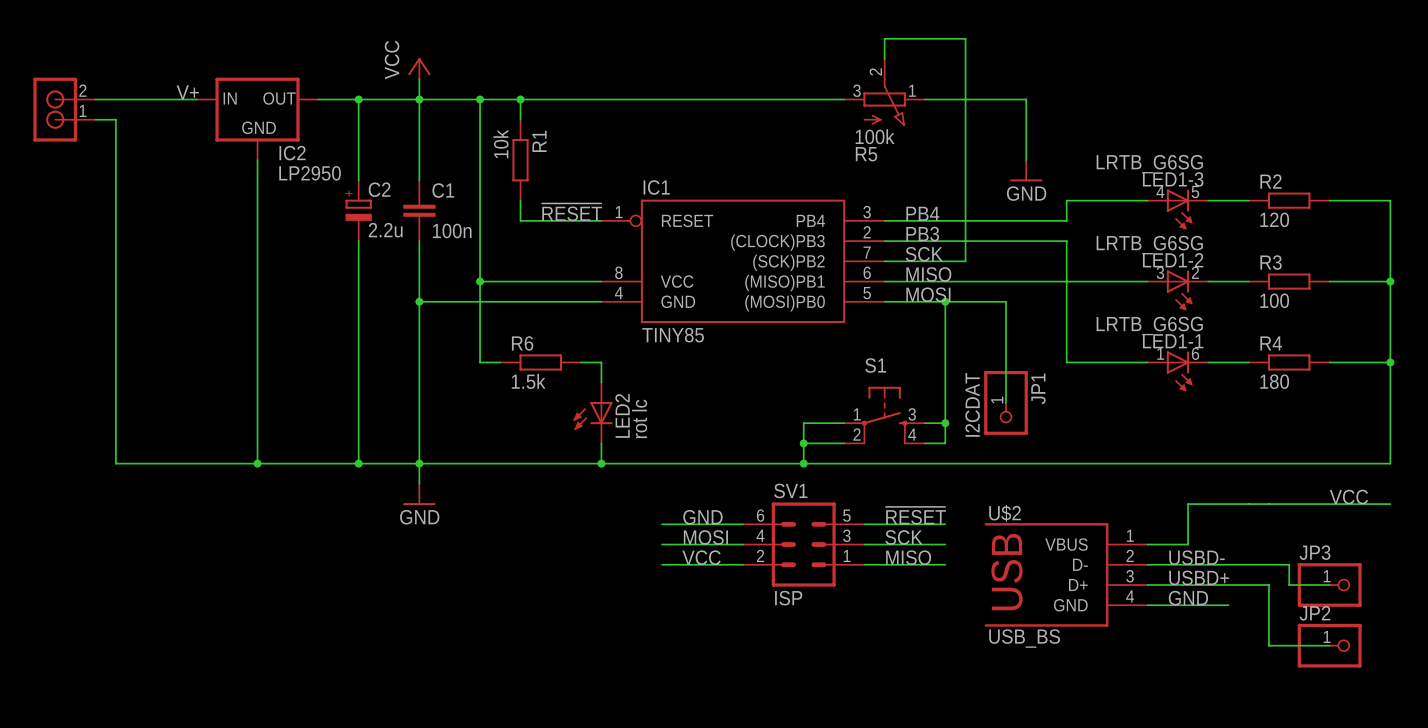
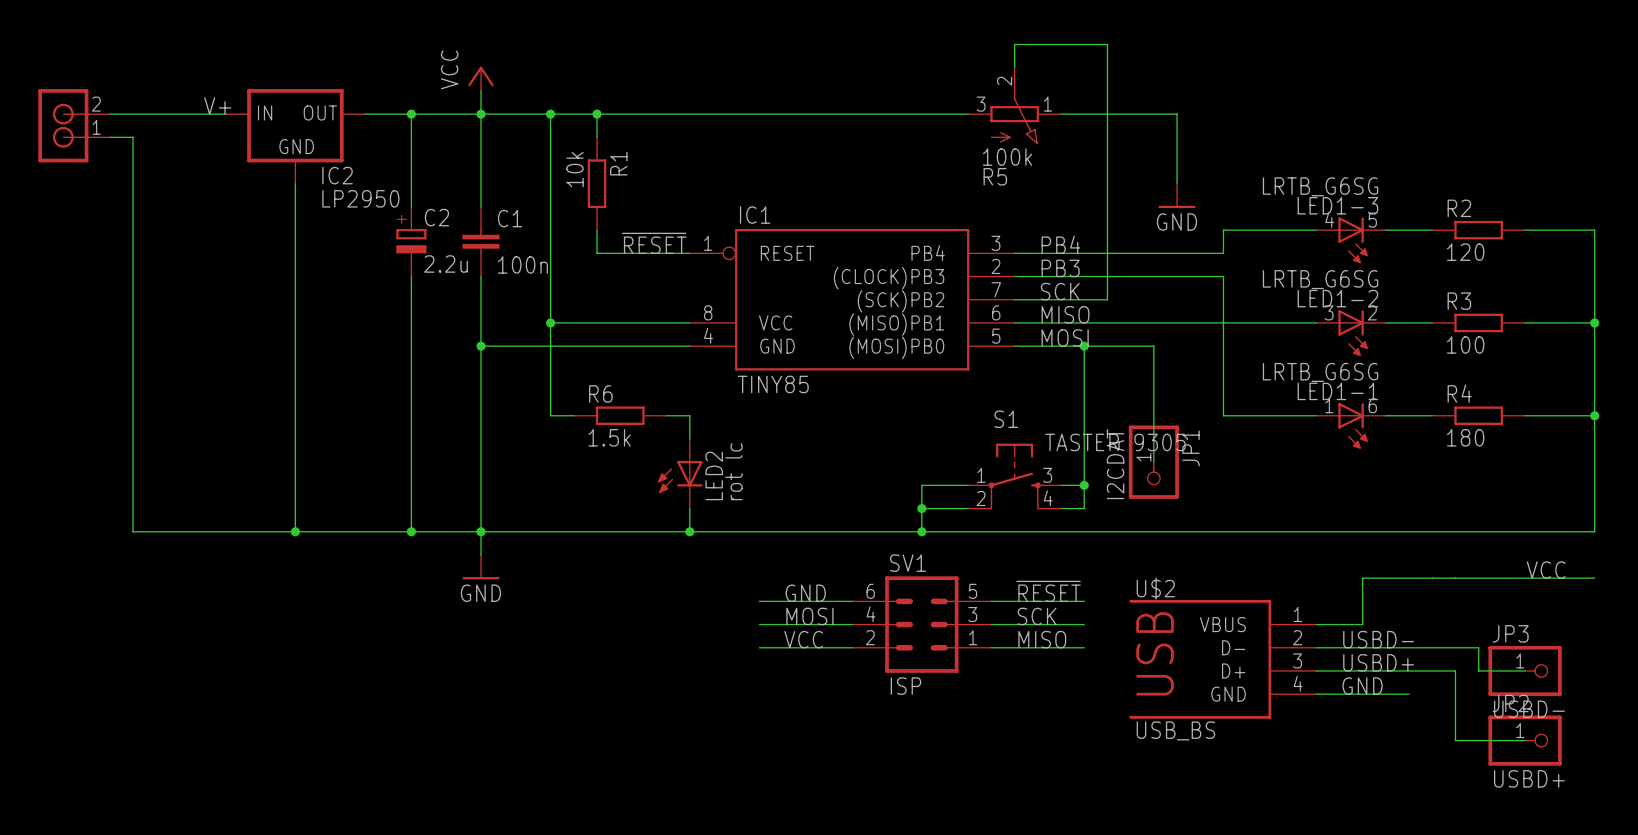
S1 value: none -> TASTER 9305 (1115, 442)
JP3 value: none -> USBD- (1529, 709)
JP2 value: none -> USBD+ (1529, 778)

